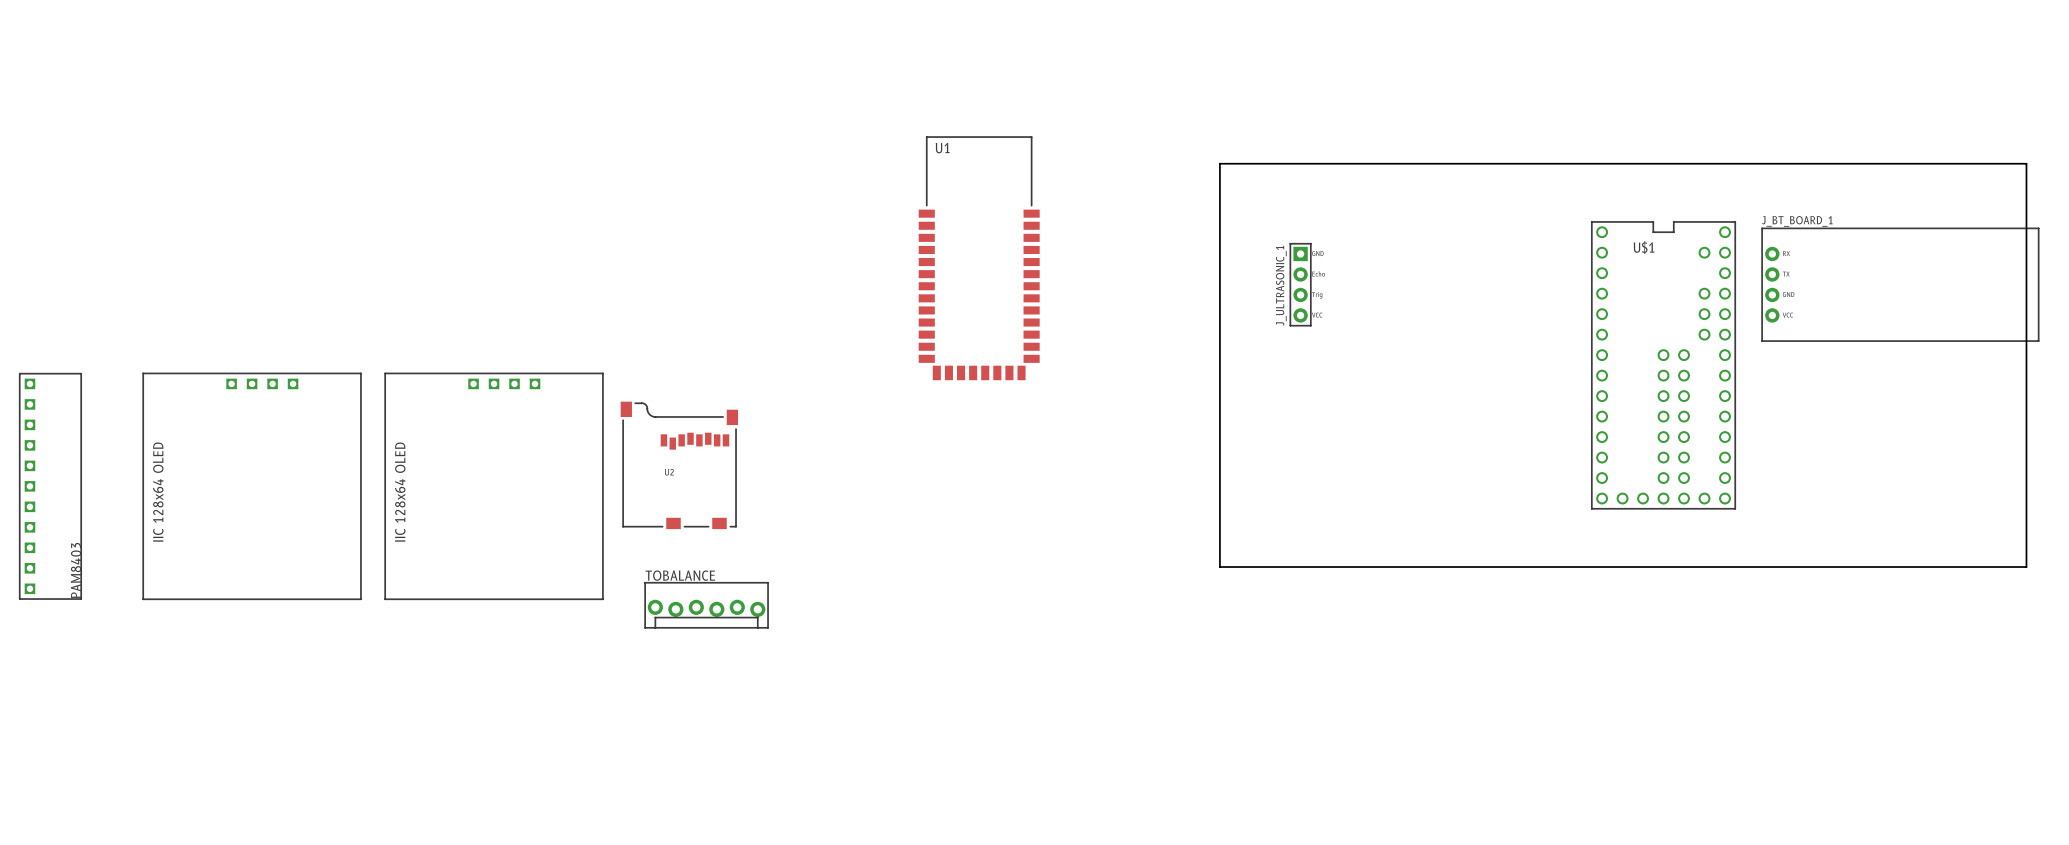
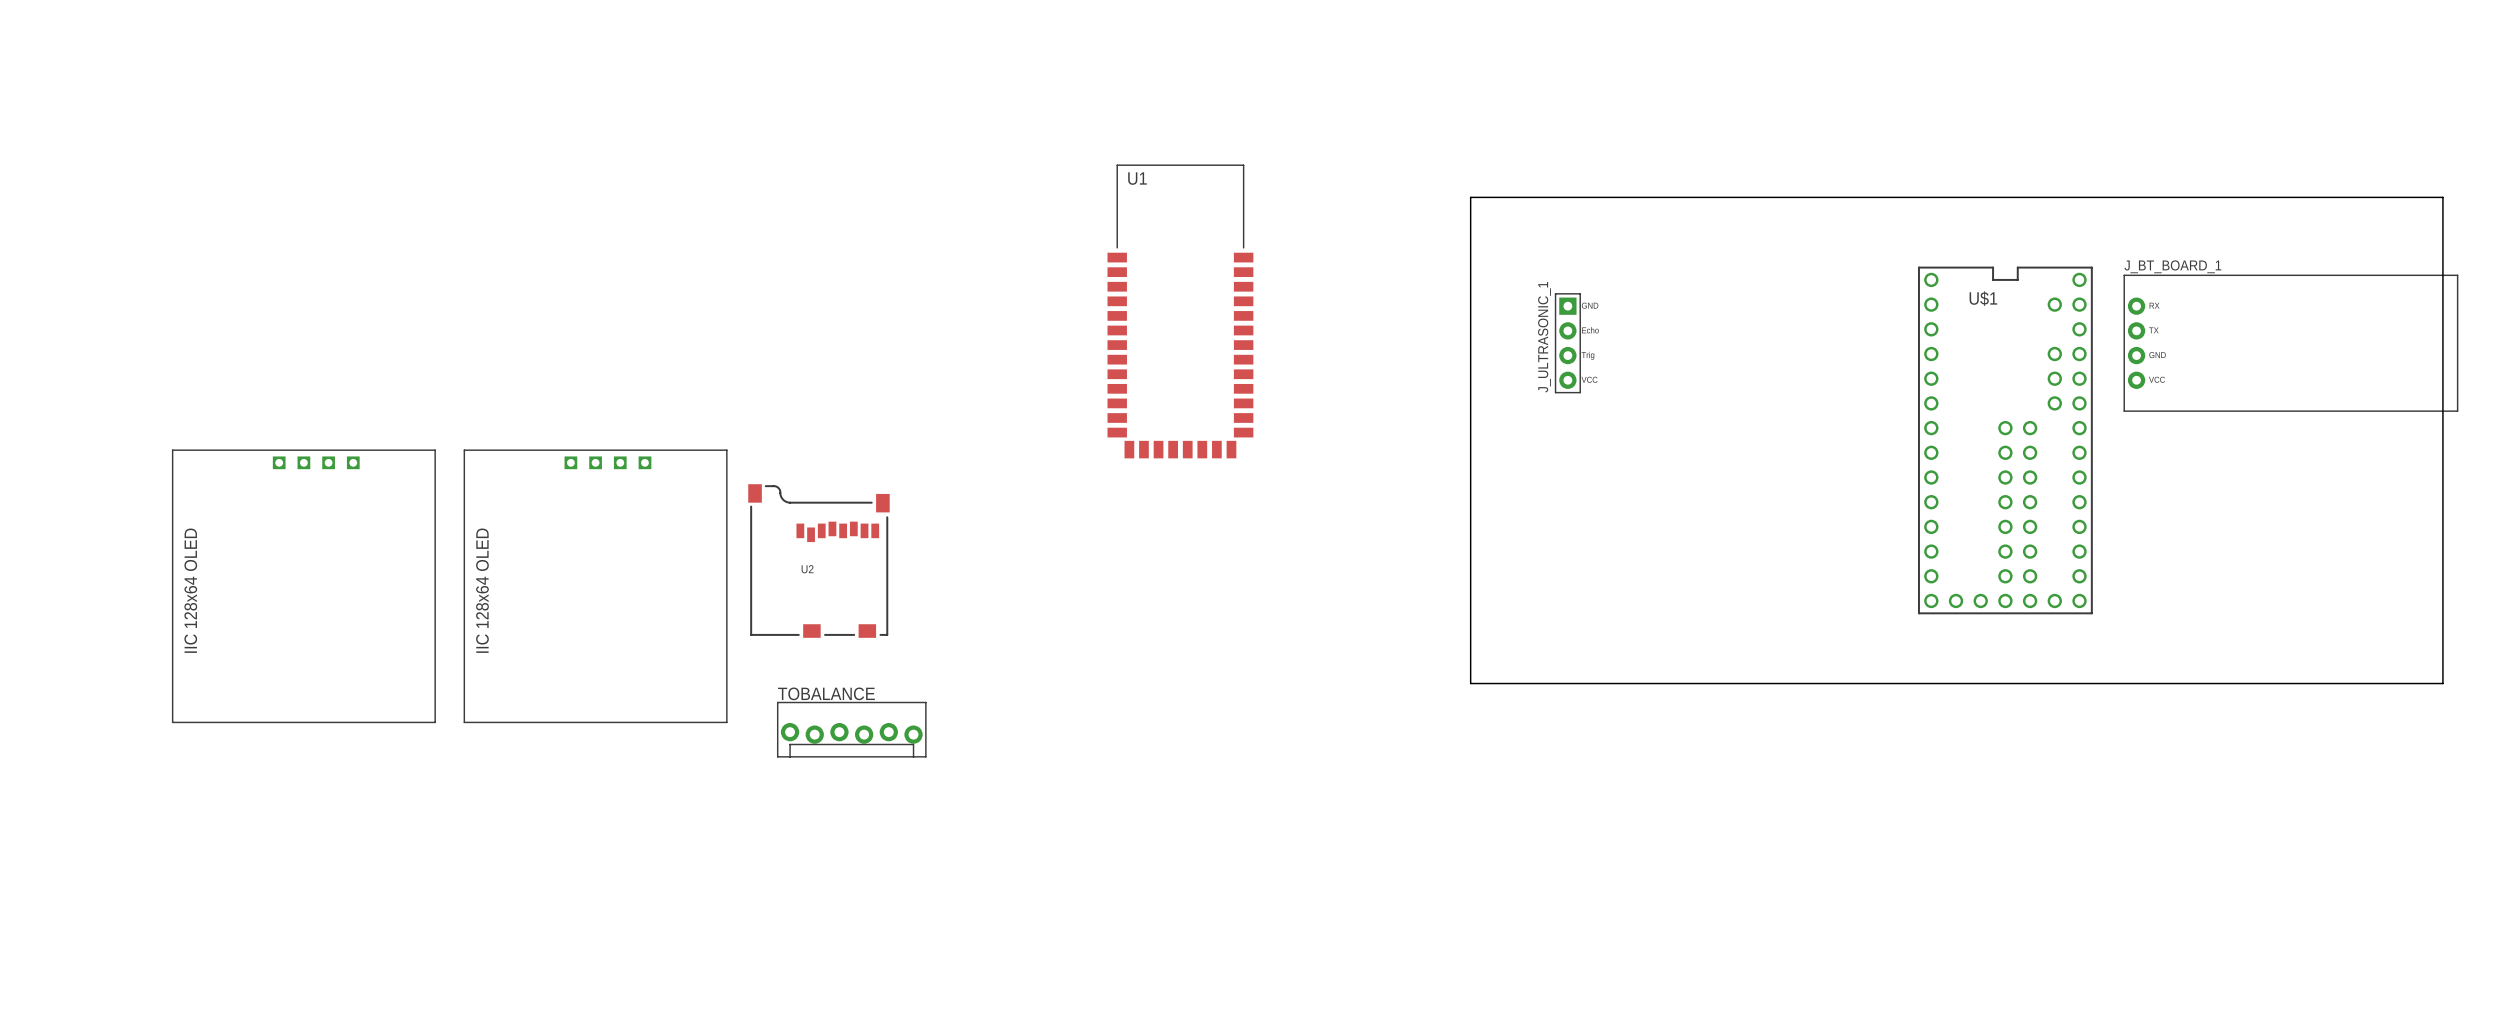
part: (50, 486) -> none

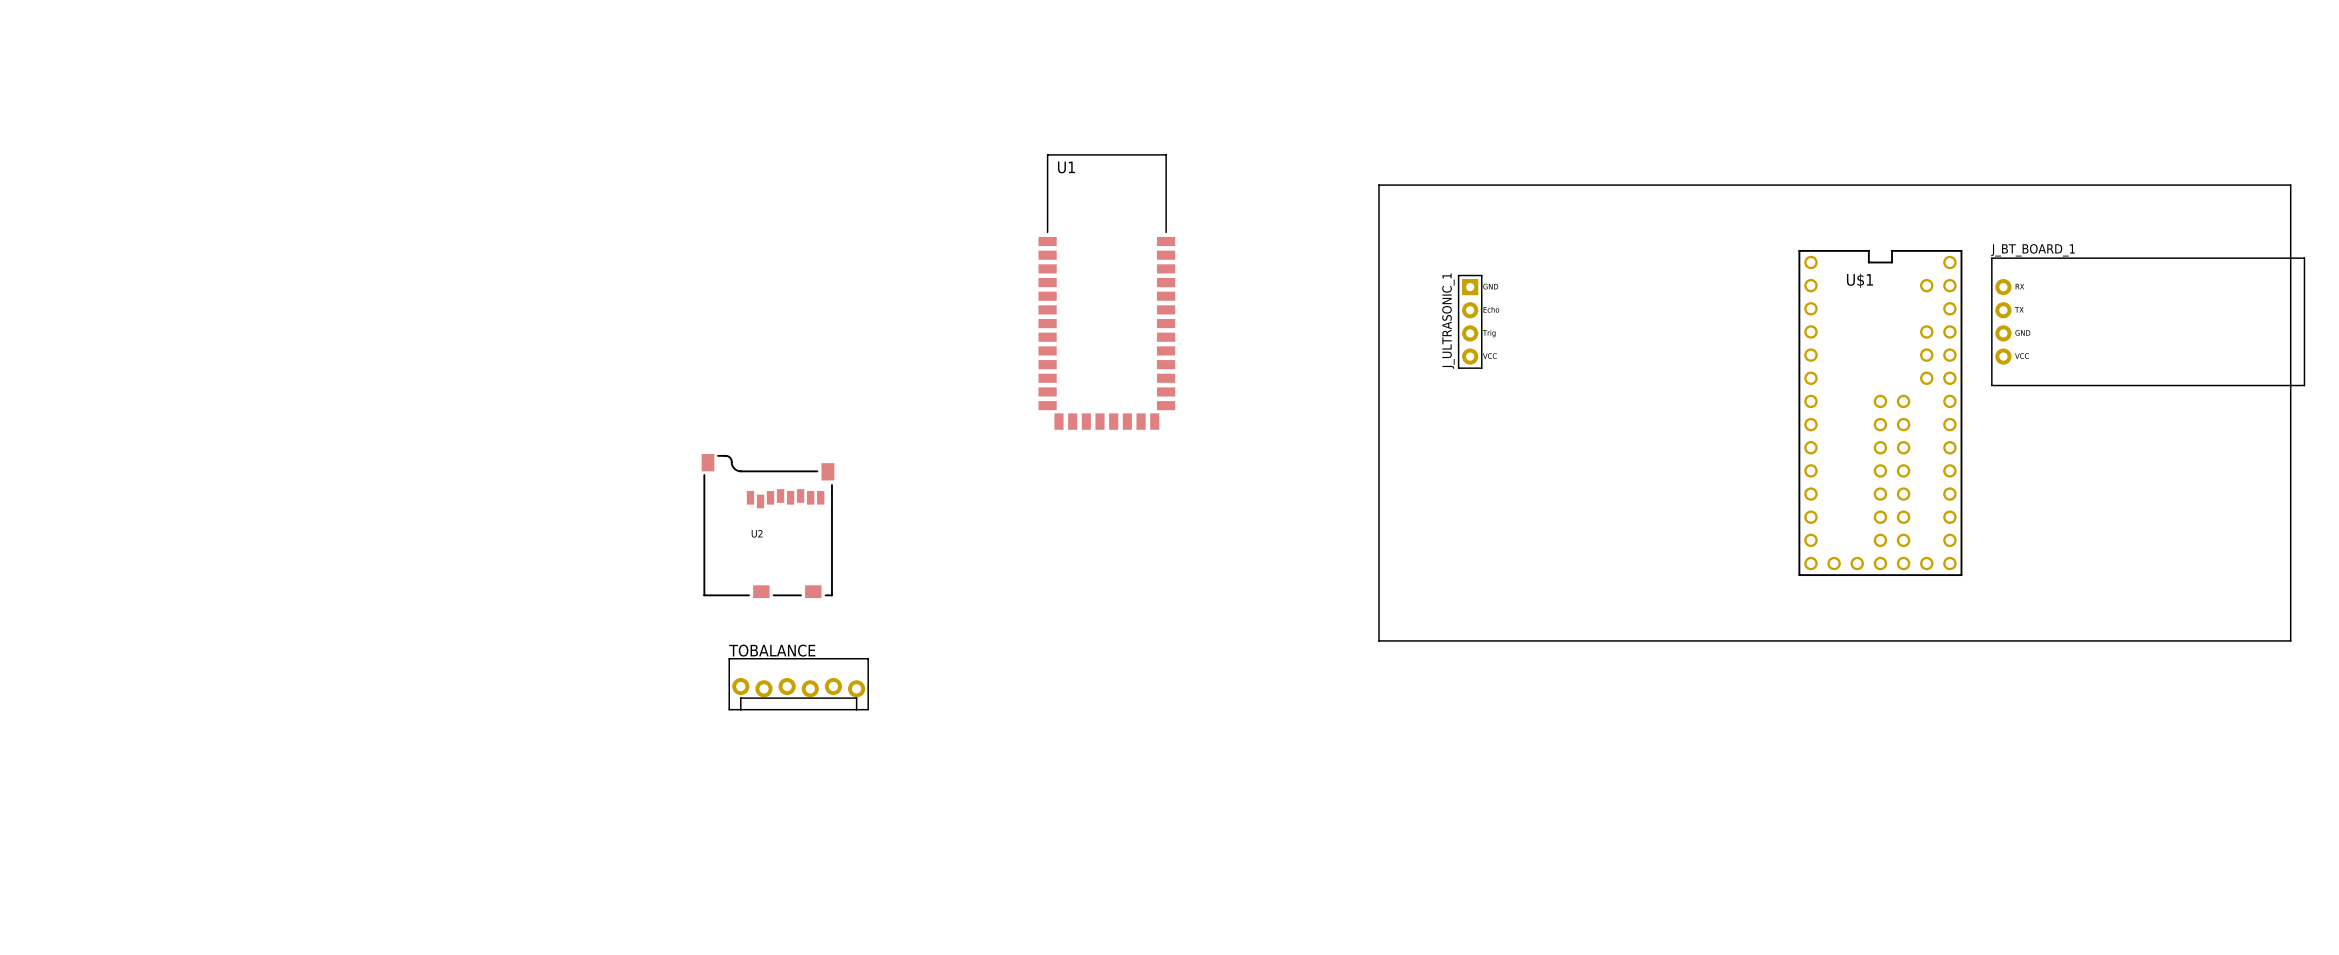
part: (303, 586) -> none
part: (595, 586) -> none

